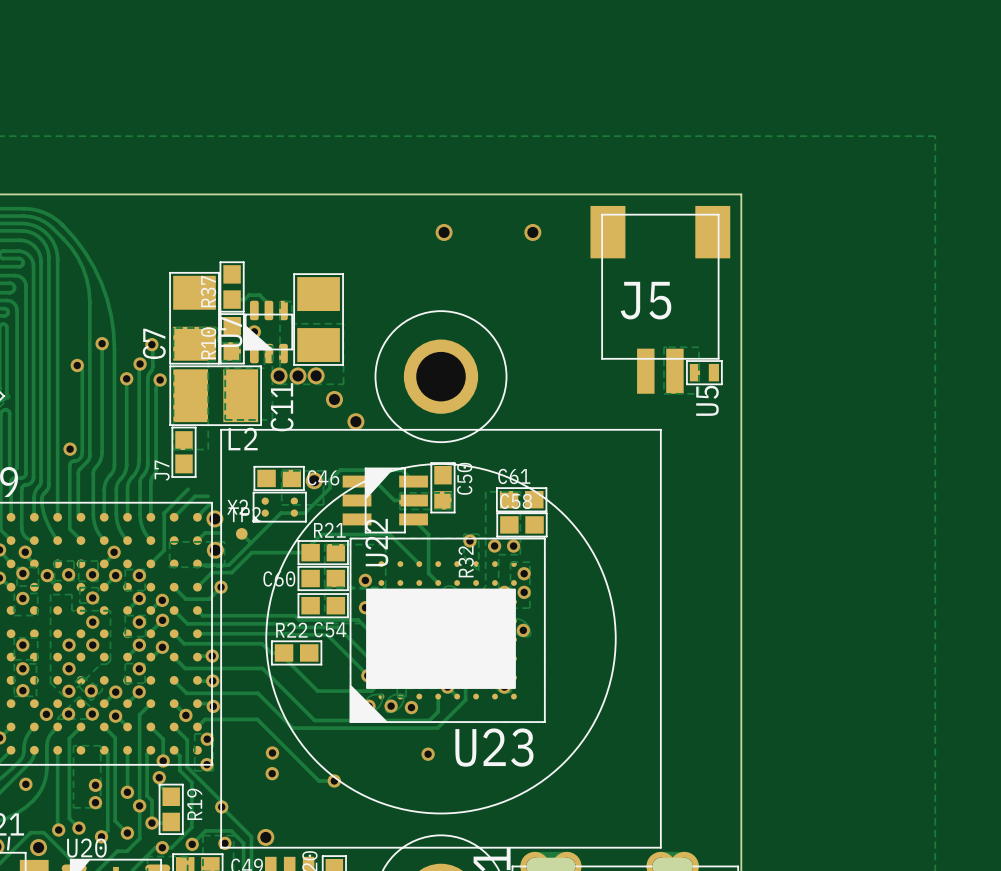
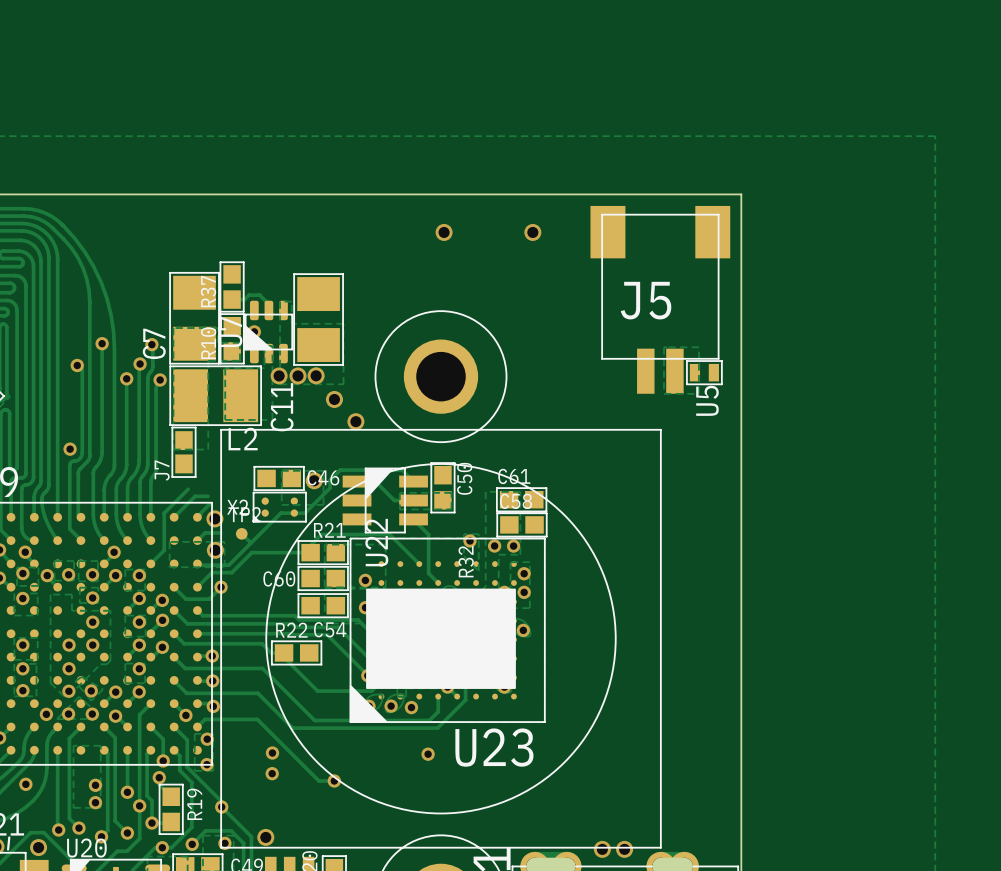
via: none -> (602, 849)
via: none -> (624, 849)

